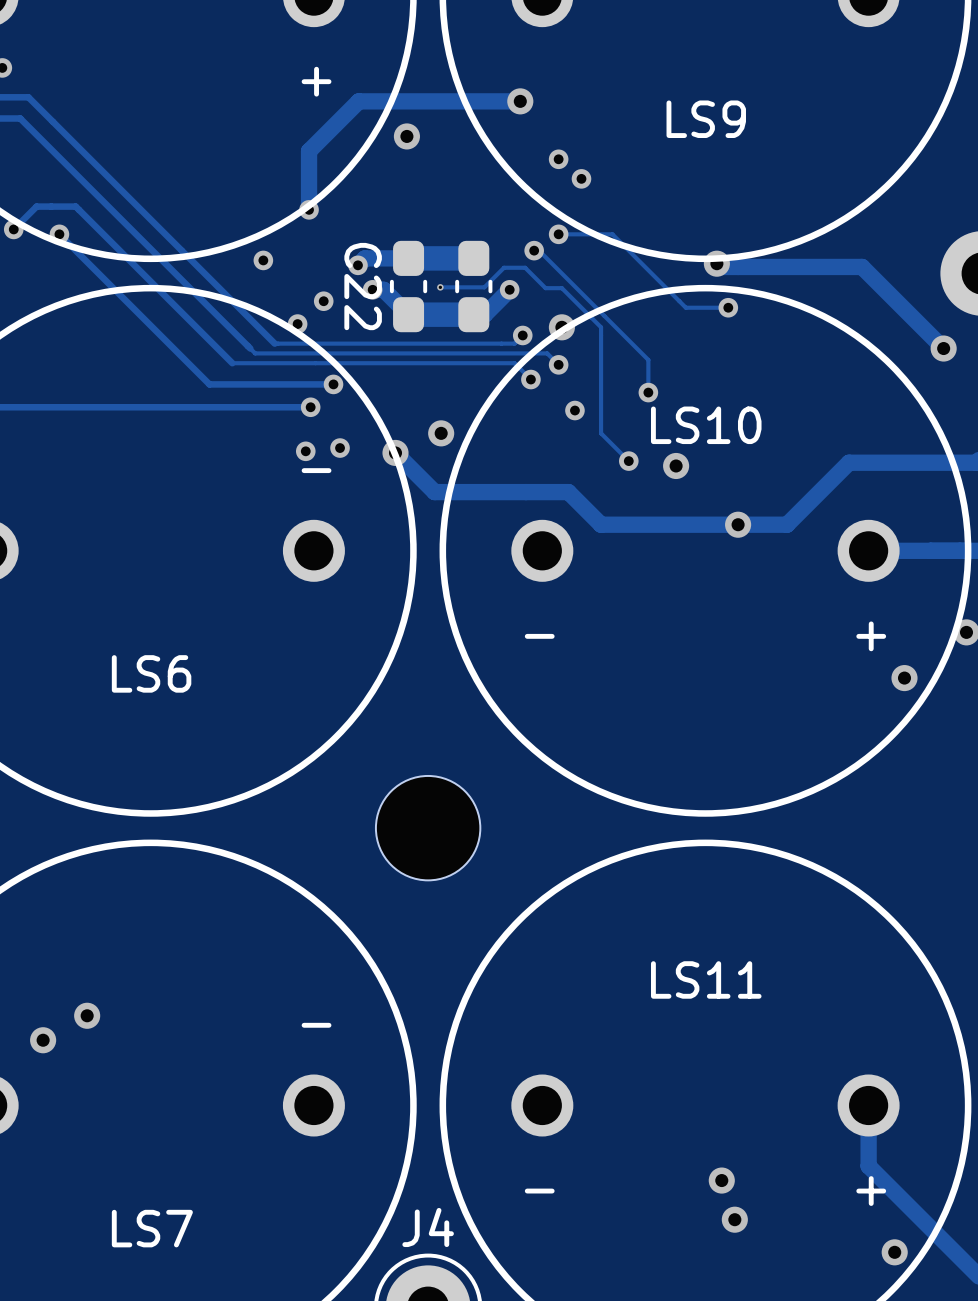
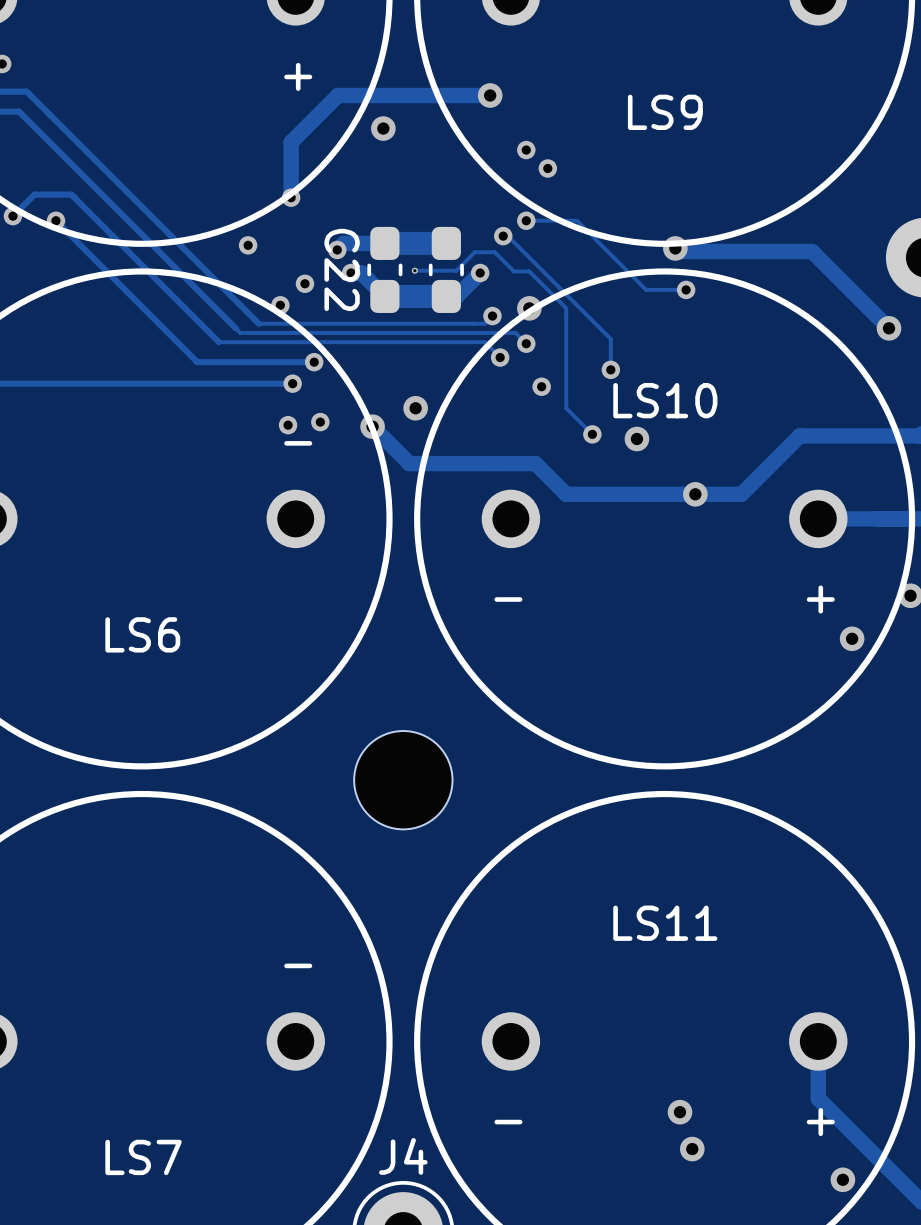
via: (87, 1015) -> none
via: (43, 1040) -> none

